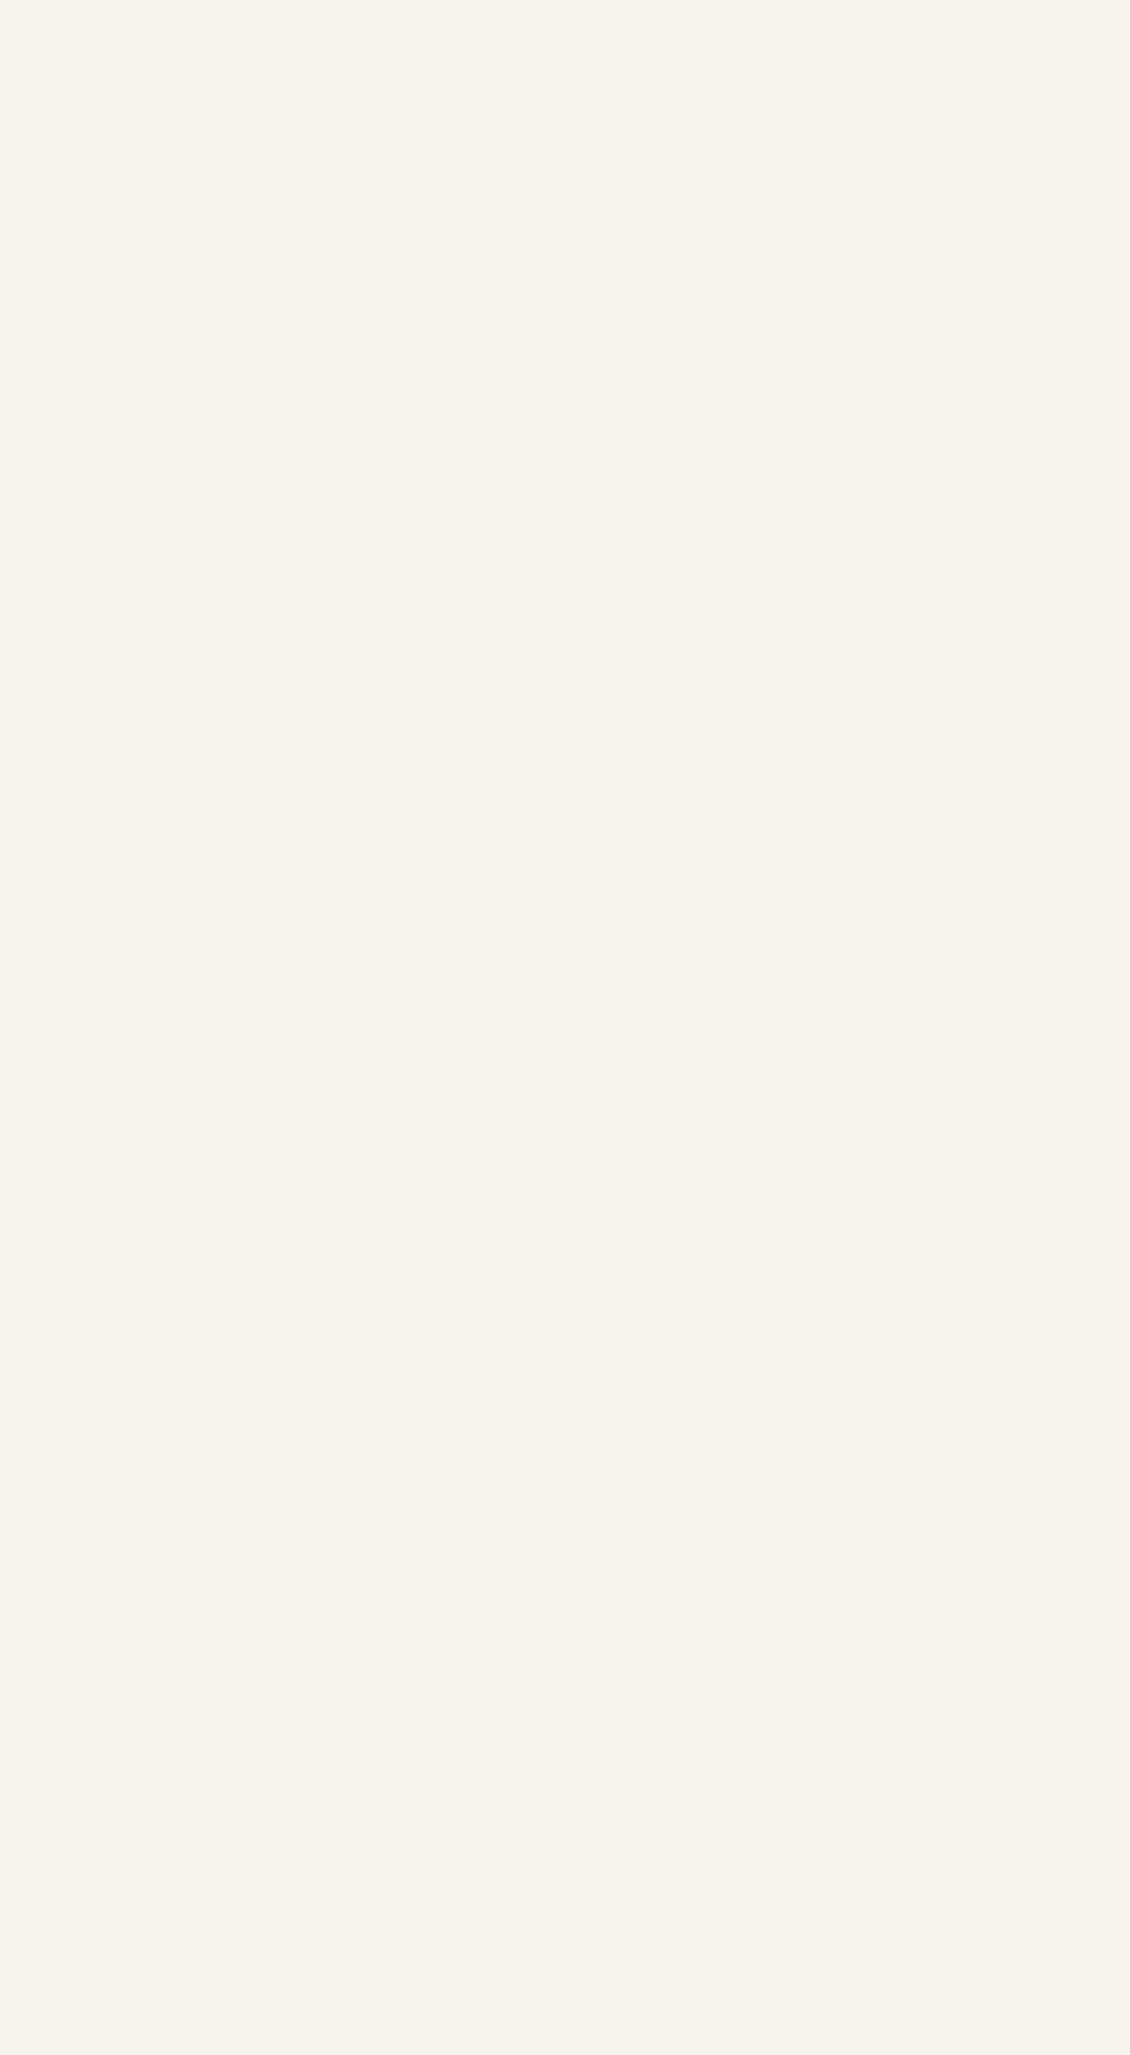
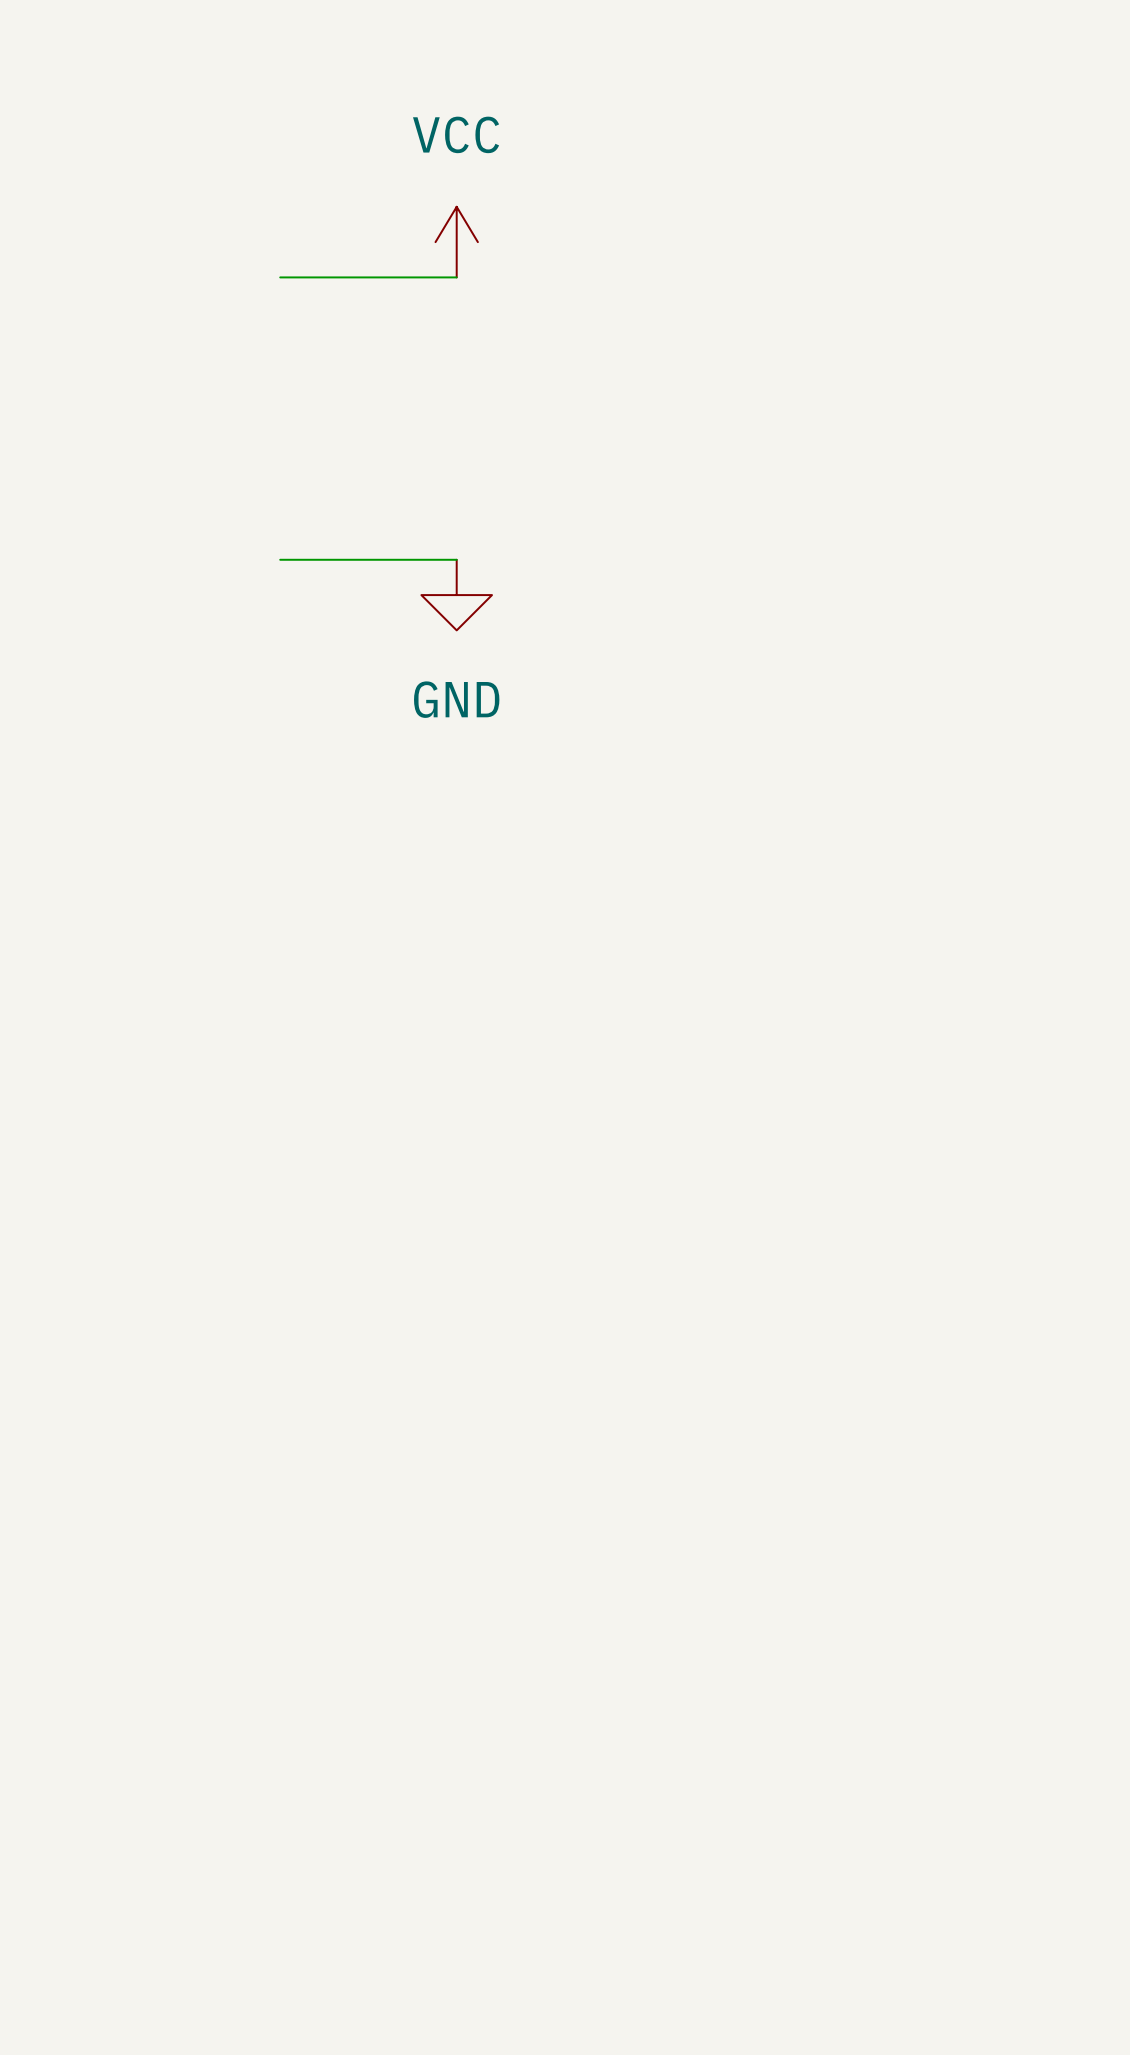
power symbol: none -> VCC (456, 242)
wire: none -> (280, 277) (456, 277)
wire: none -> (280, 559) (456, 559)
power symbol: none -> GND (456, 595)

